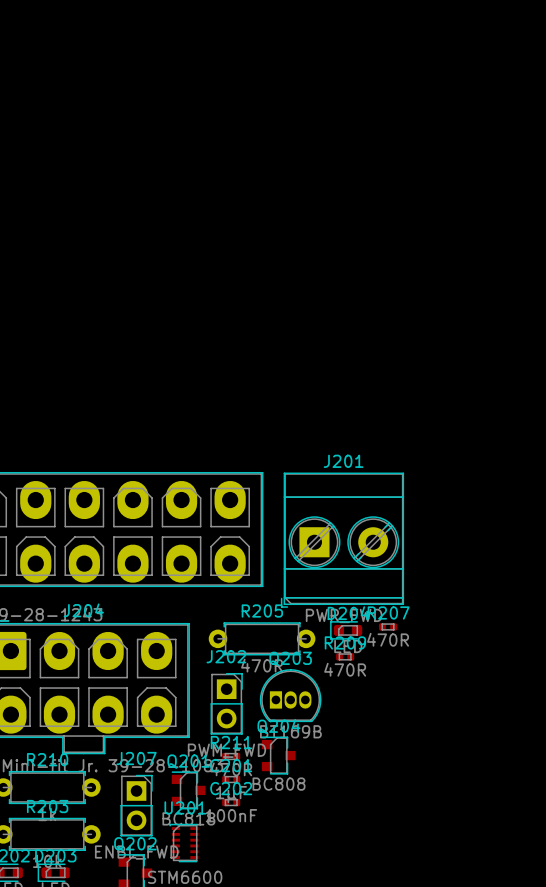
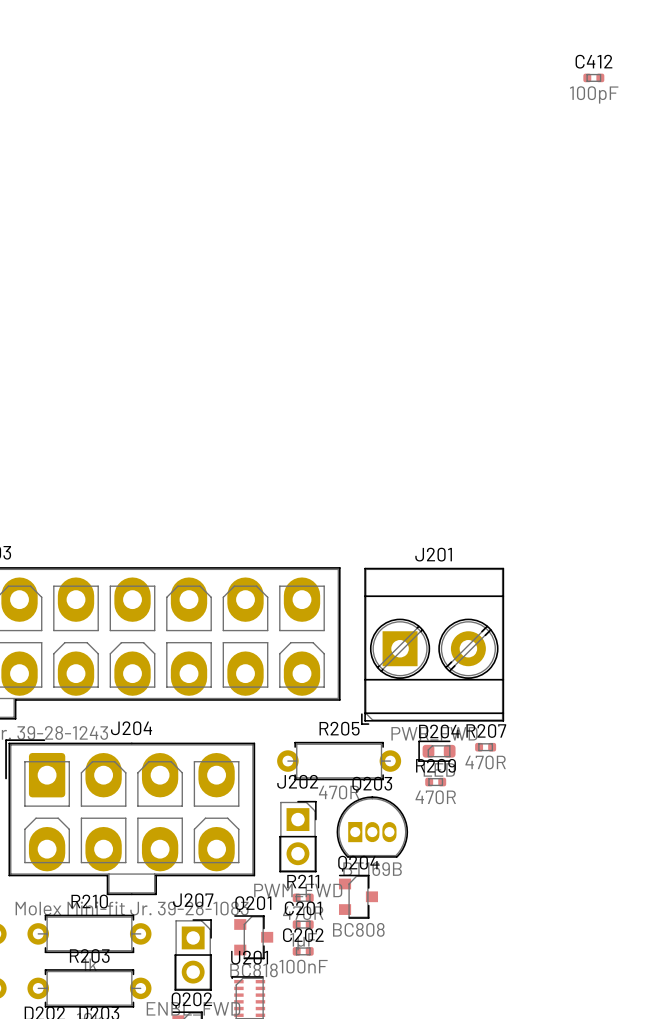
C412: none -> 100pF (593, 77)

